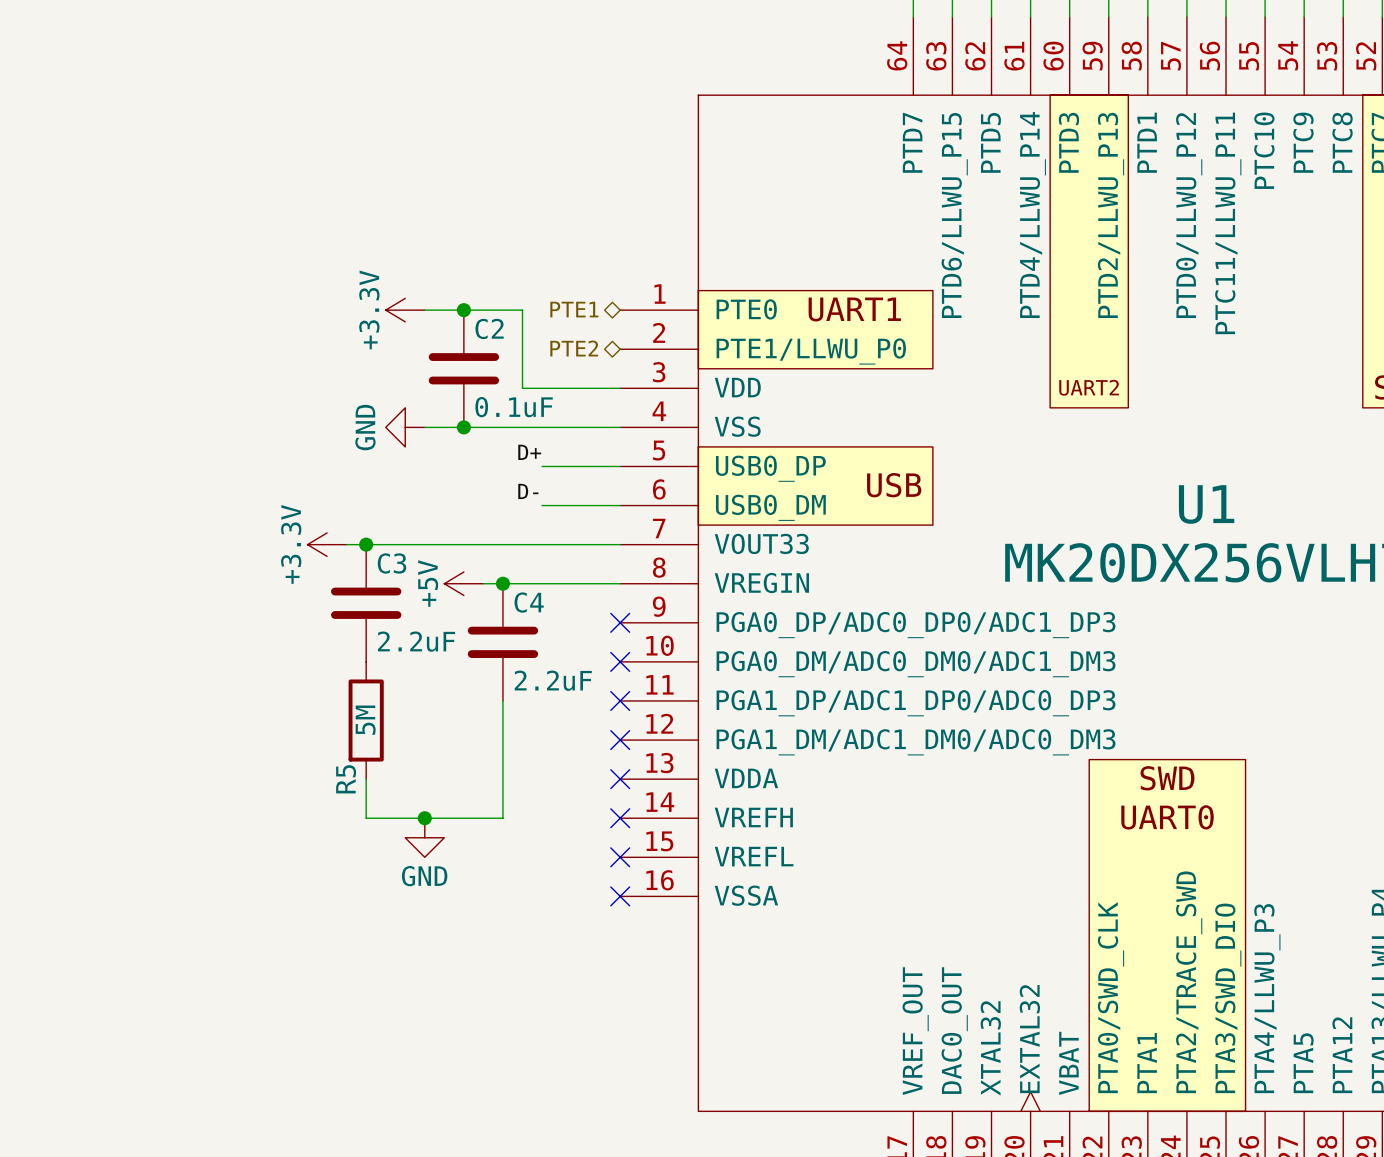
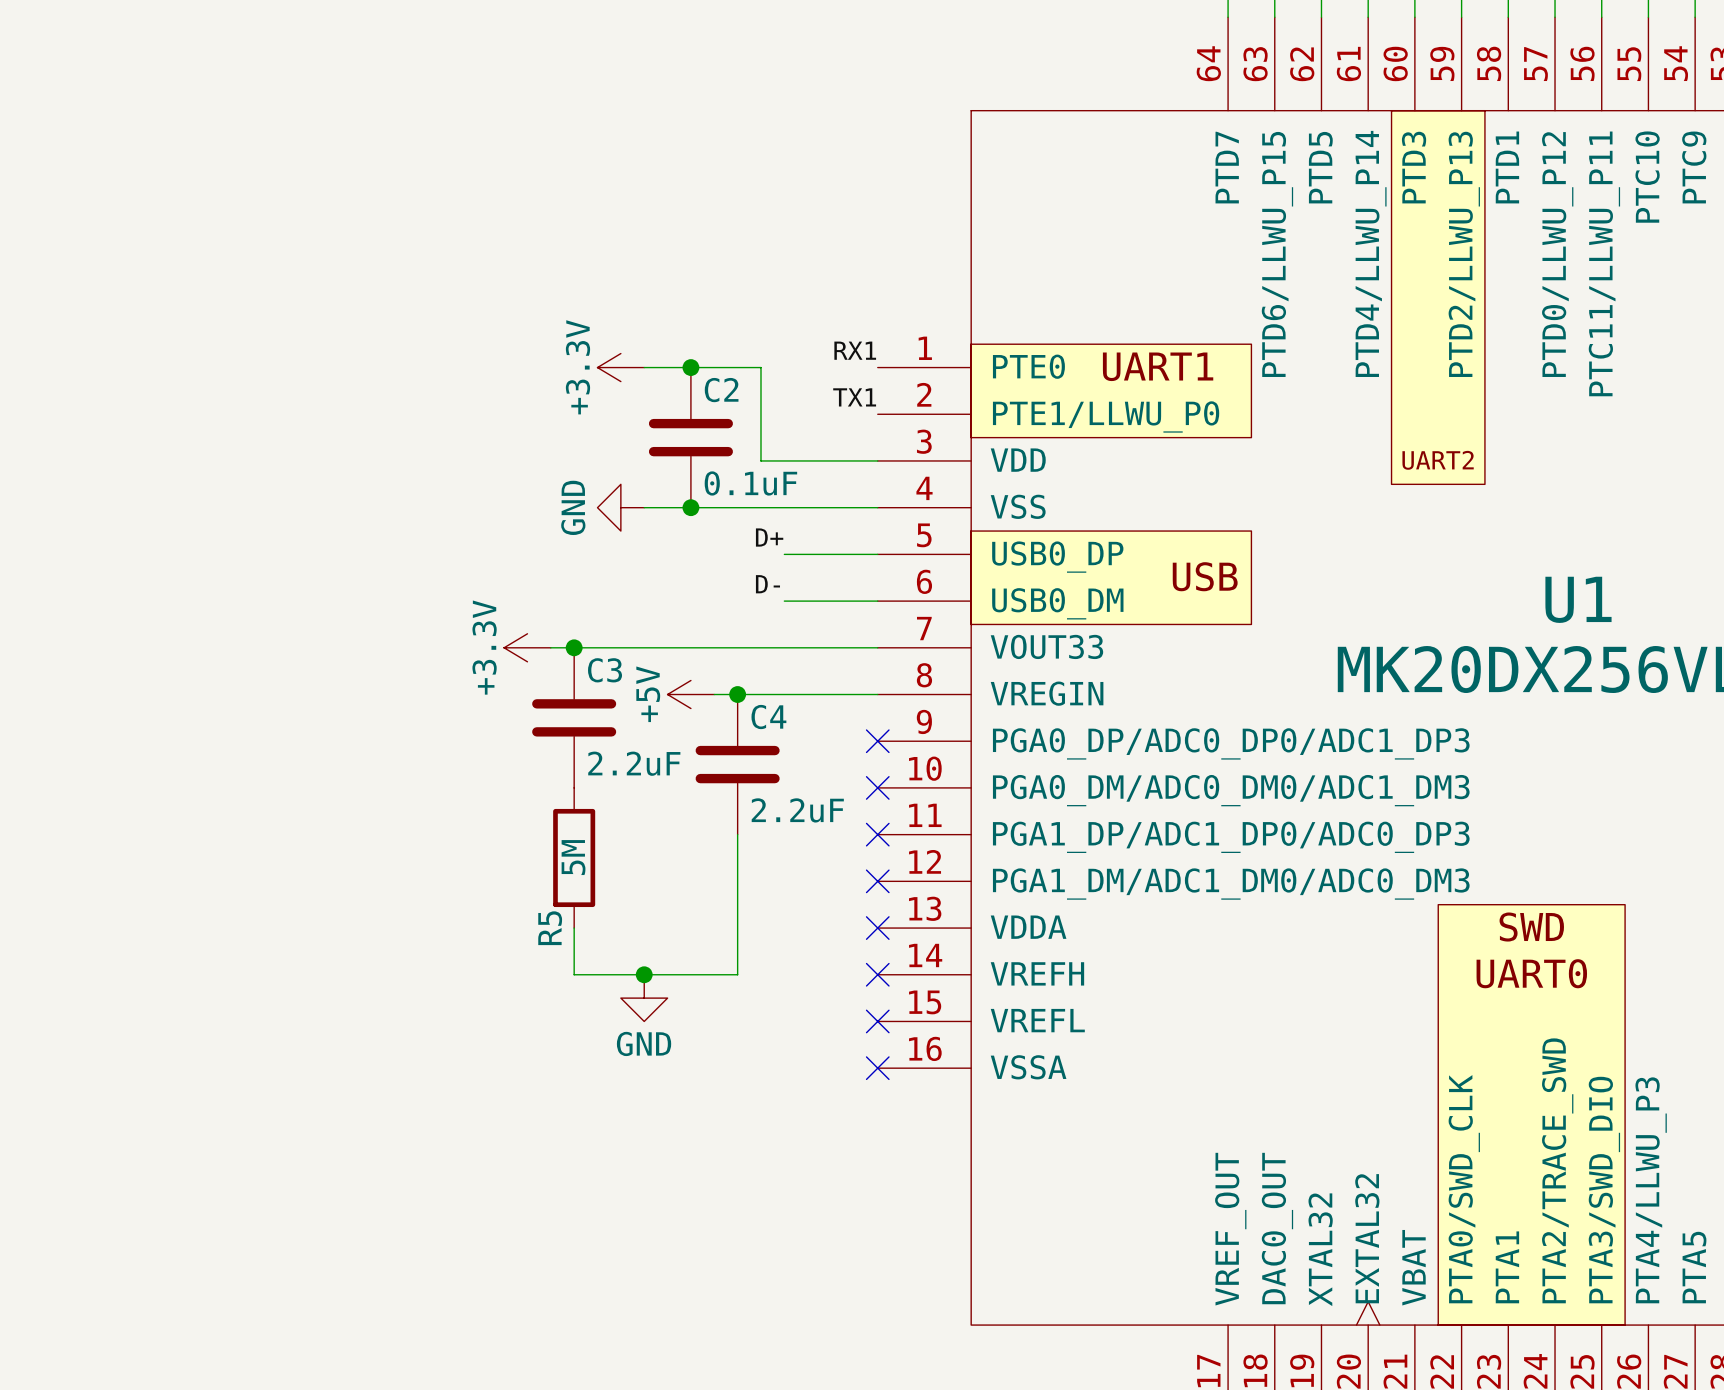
label: none -> RX1 (855, 350)
hierarchical label: PTE1 (574, 309) -> none
label: none -> TX1 (854, 397)
hierarchical label: PTE2 (574, 348) -> none

